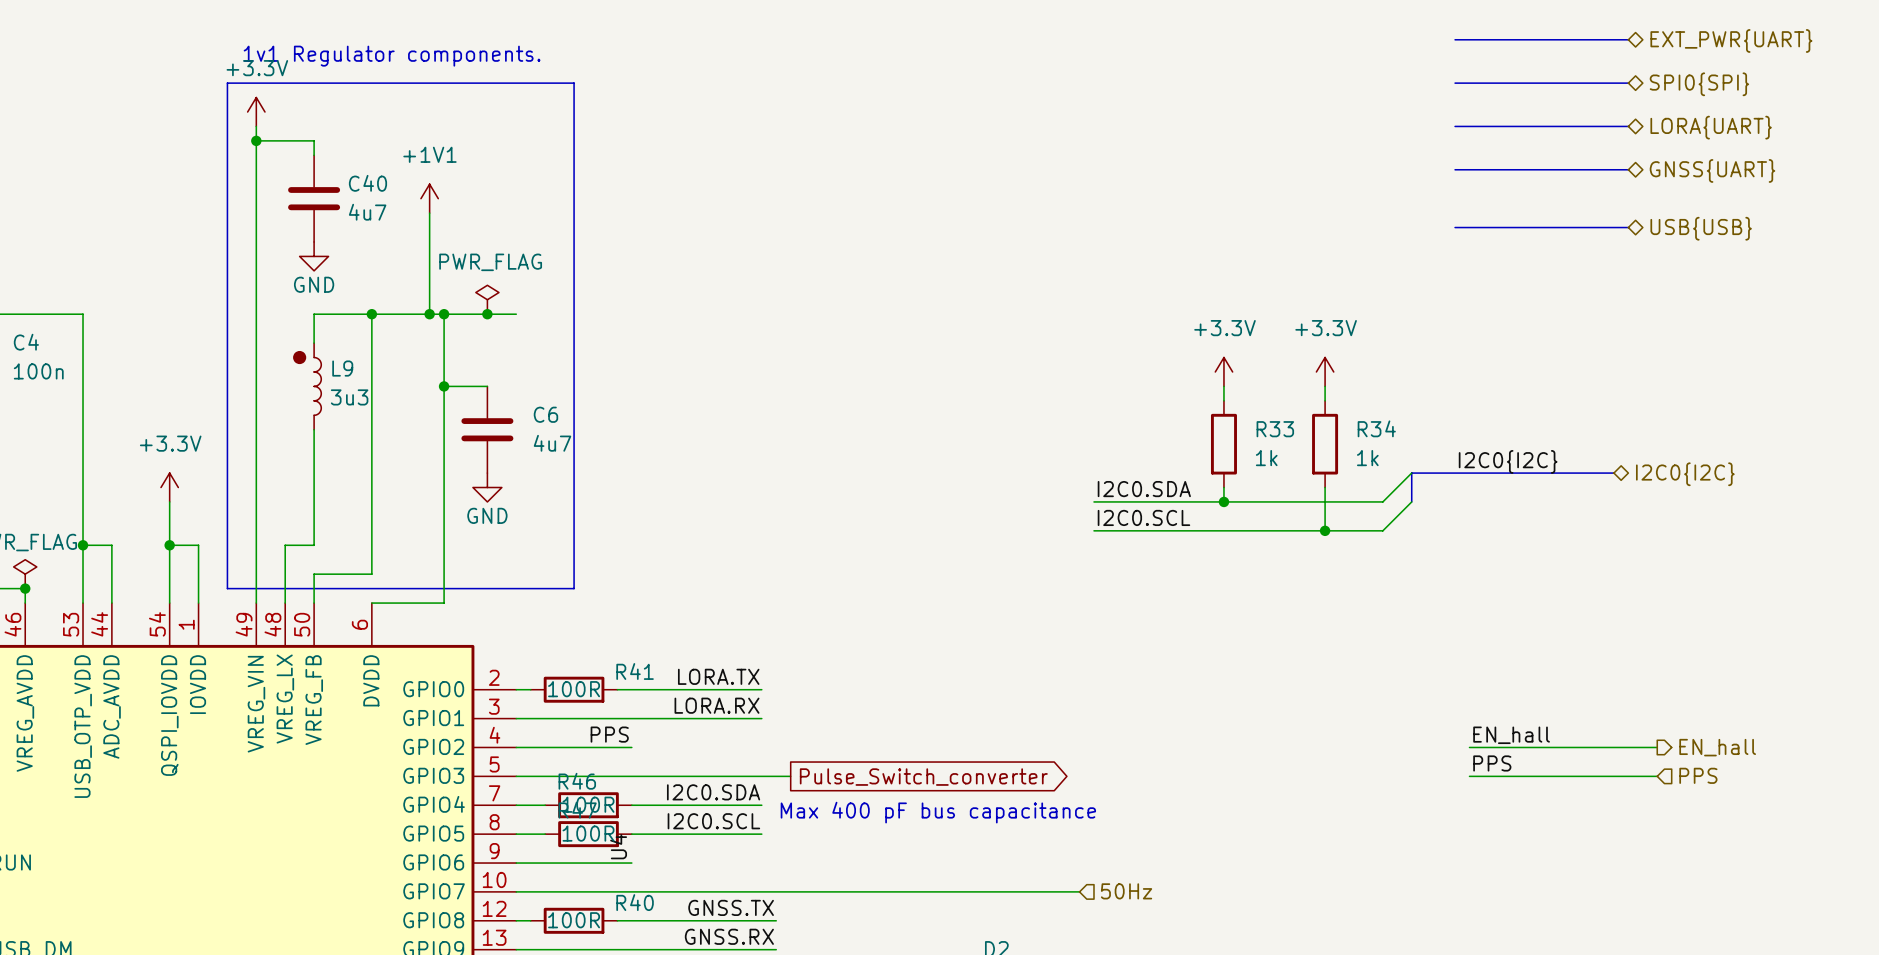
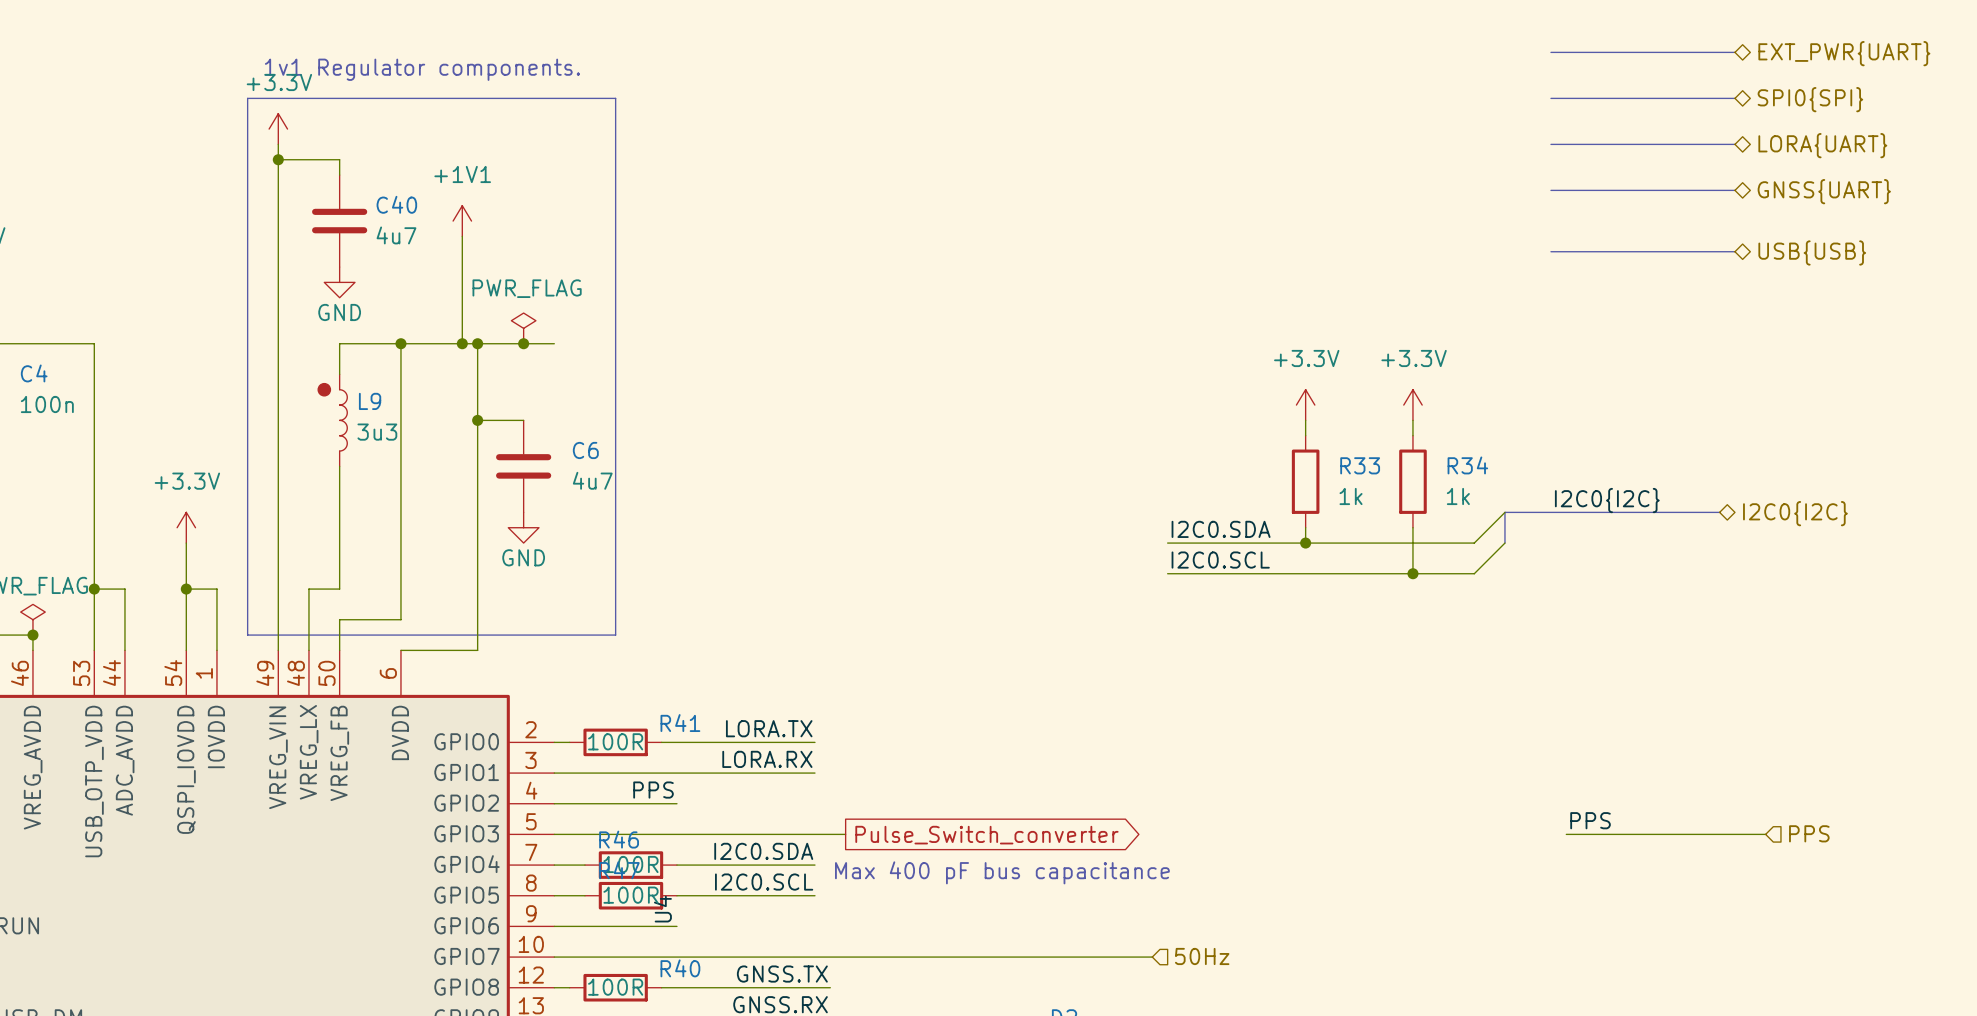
label: EN_hall (1511, 735) -> none
wire: (1469, 747) (1657, 747) -> none
hierarchical label: EN_hall (1717, 747) -> none

